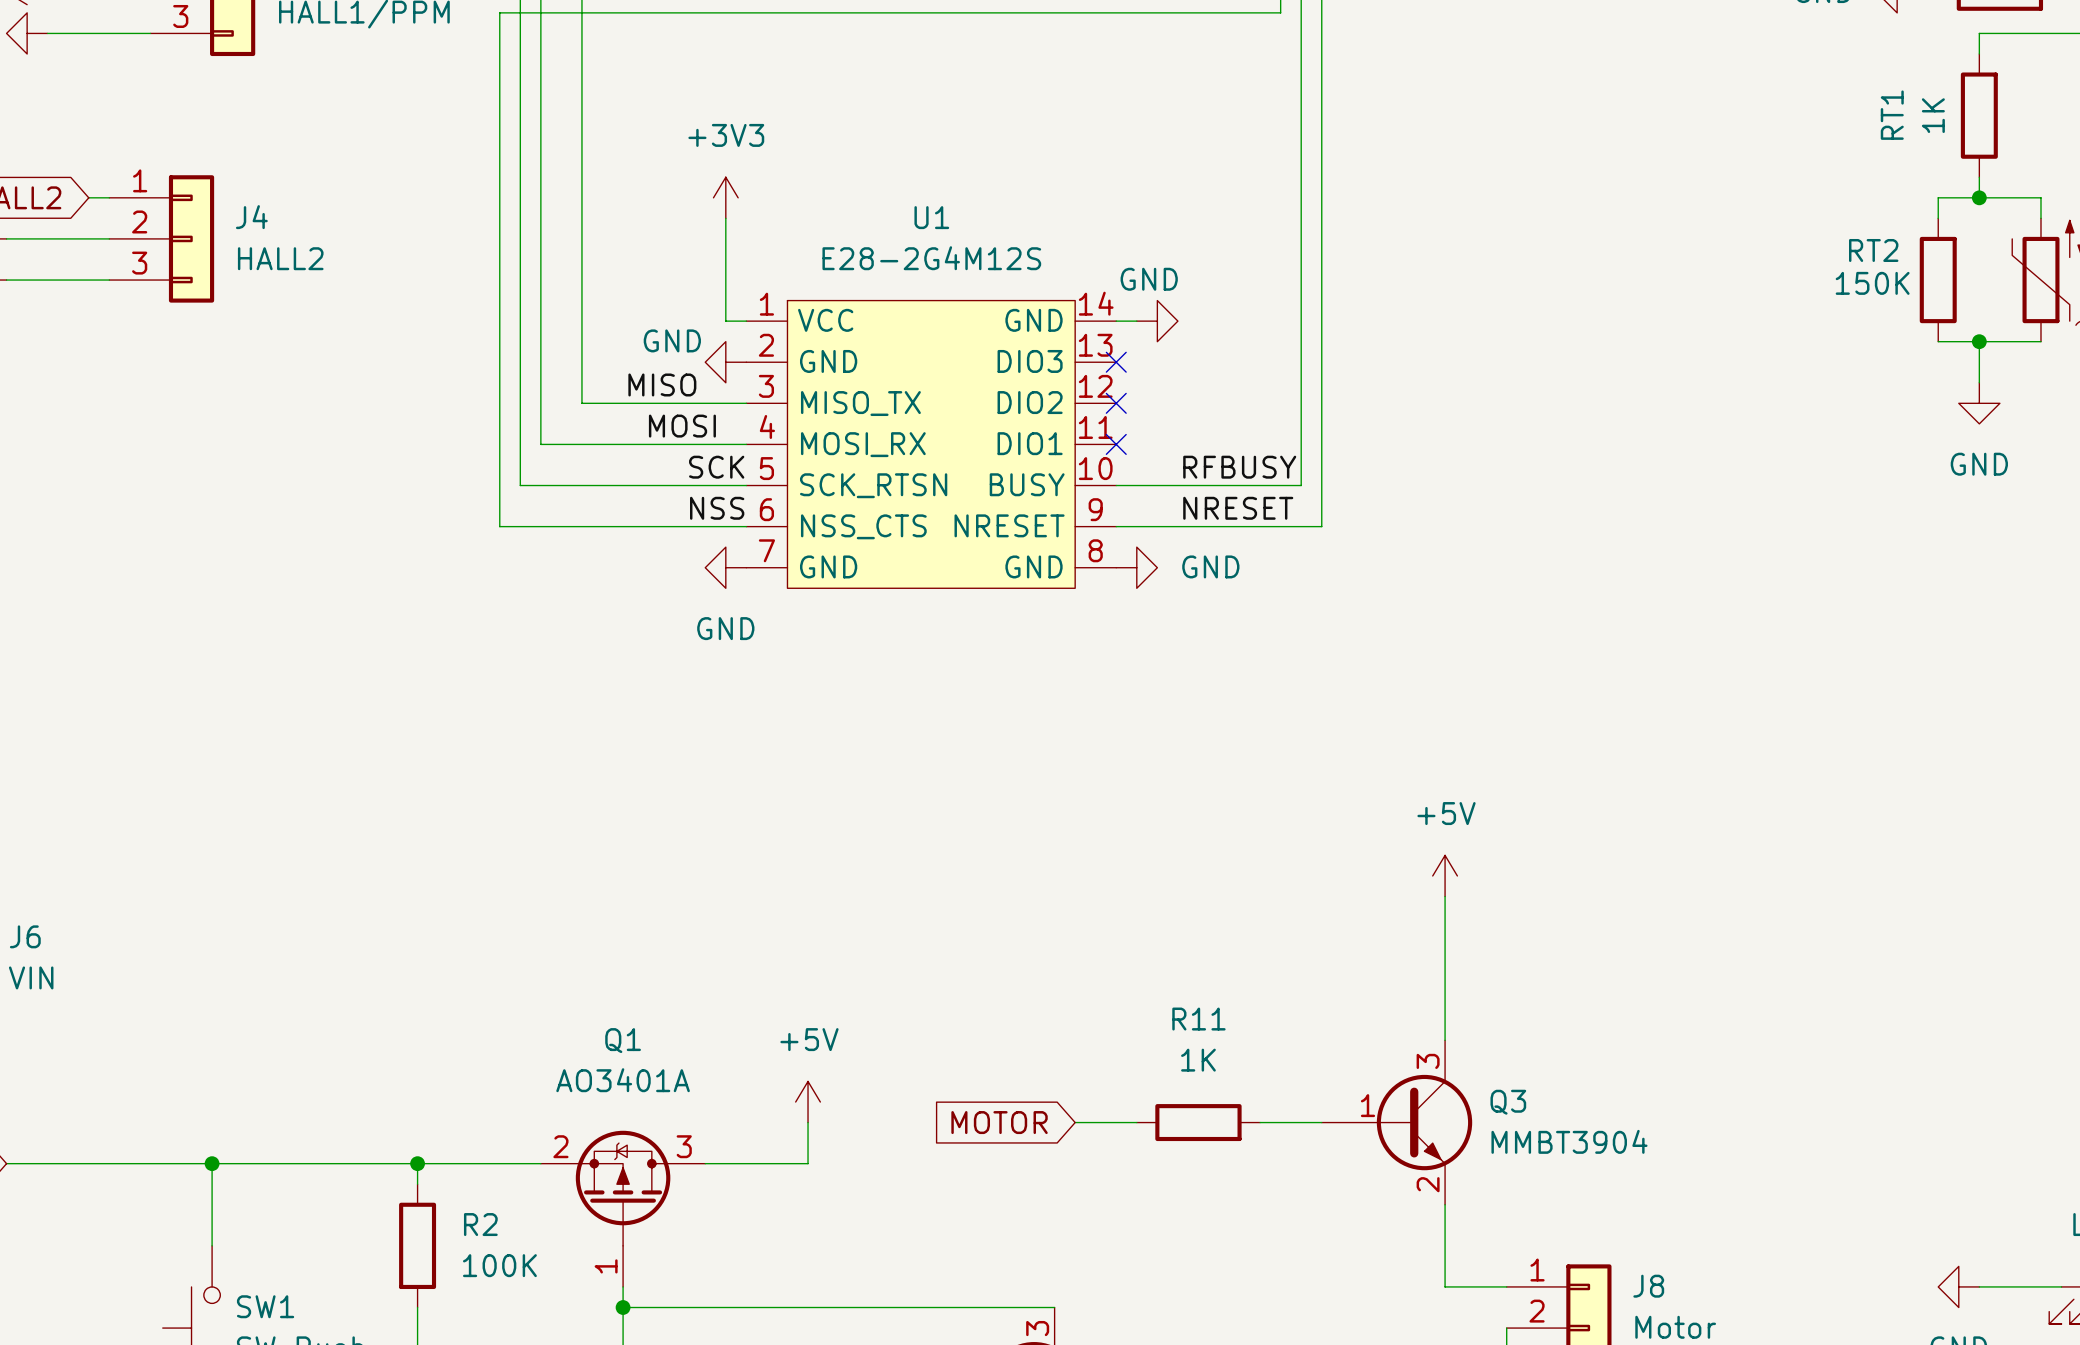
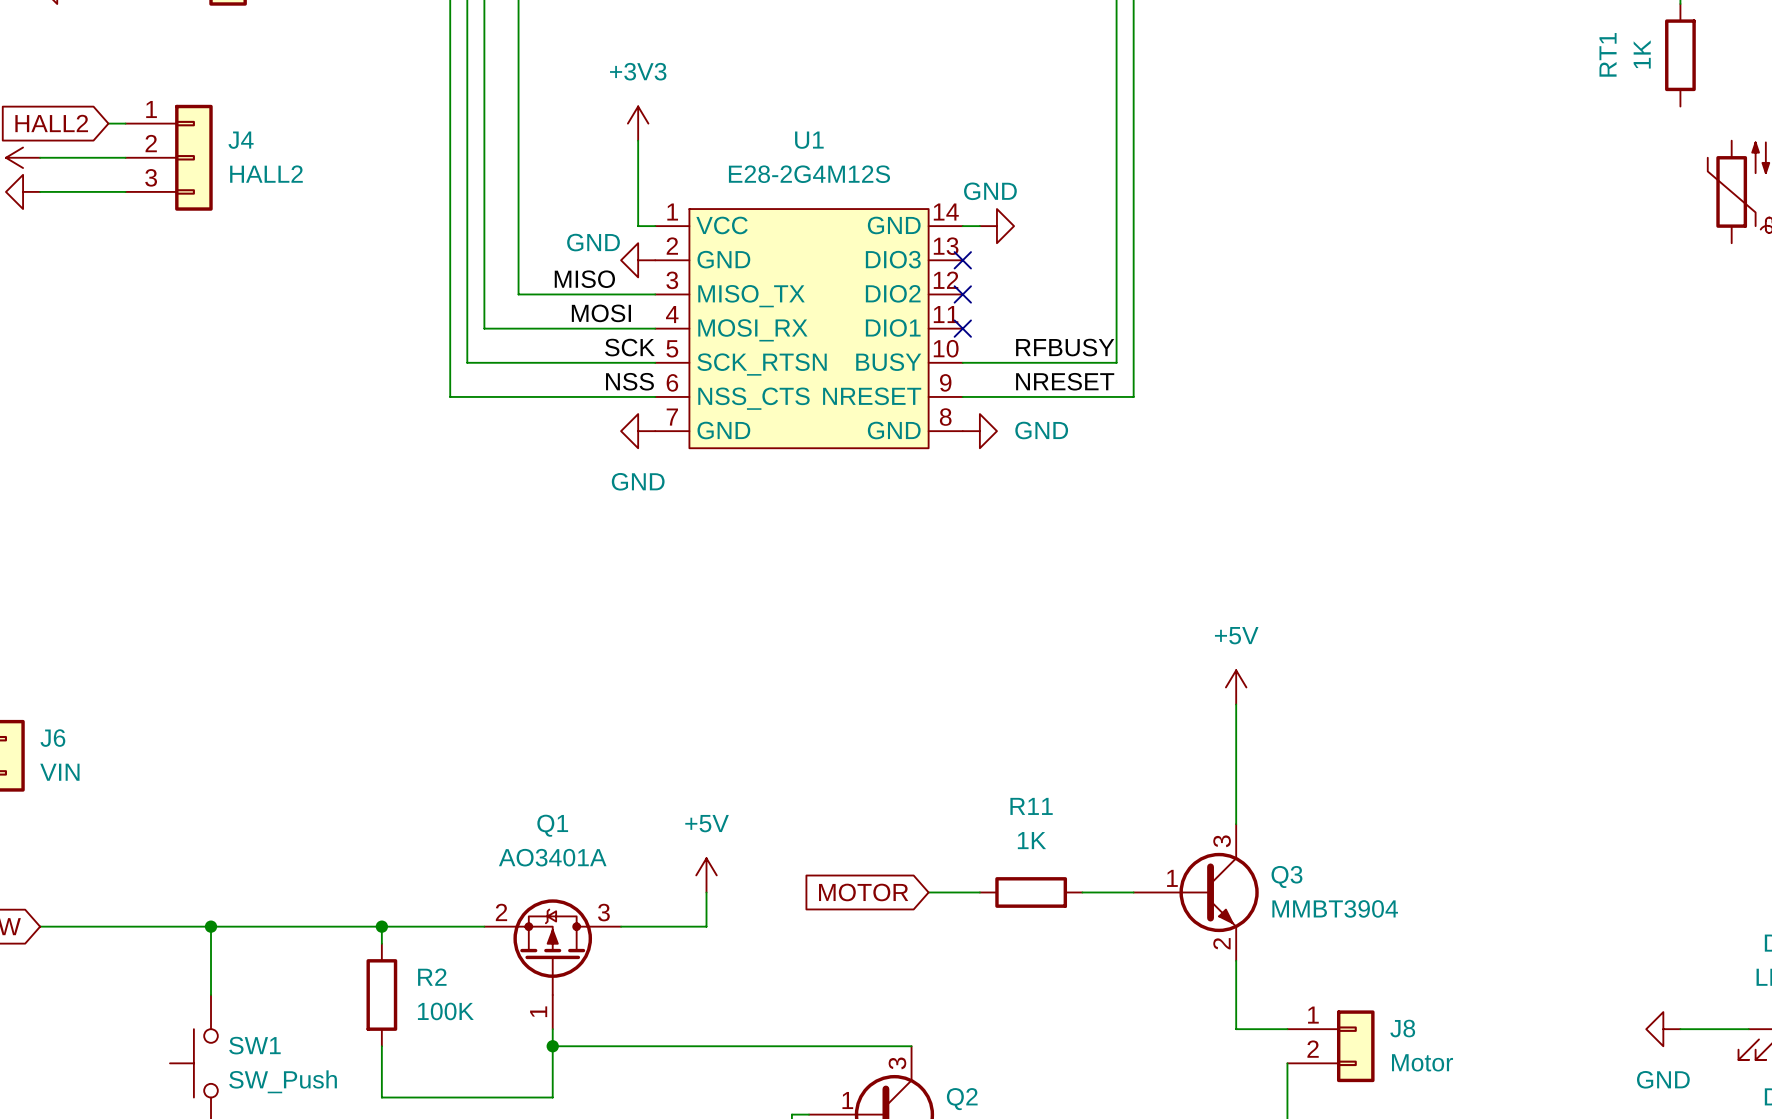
wire: (1979, 177) (1979, 197) -> none
junction: (1979, 197) -> none
wire: (1938, 218) (1938, 197) (2040, 197) (2040, 218) -> none
RT2: 150K (1938, 280) -> none
wire: (1938, 341) (2040, 341) -> none
wire: (1979, 341) (1979, 382) -> none
junction: (1979, 341) -> none
power symbol: GND (1979, 403) -> none

